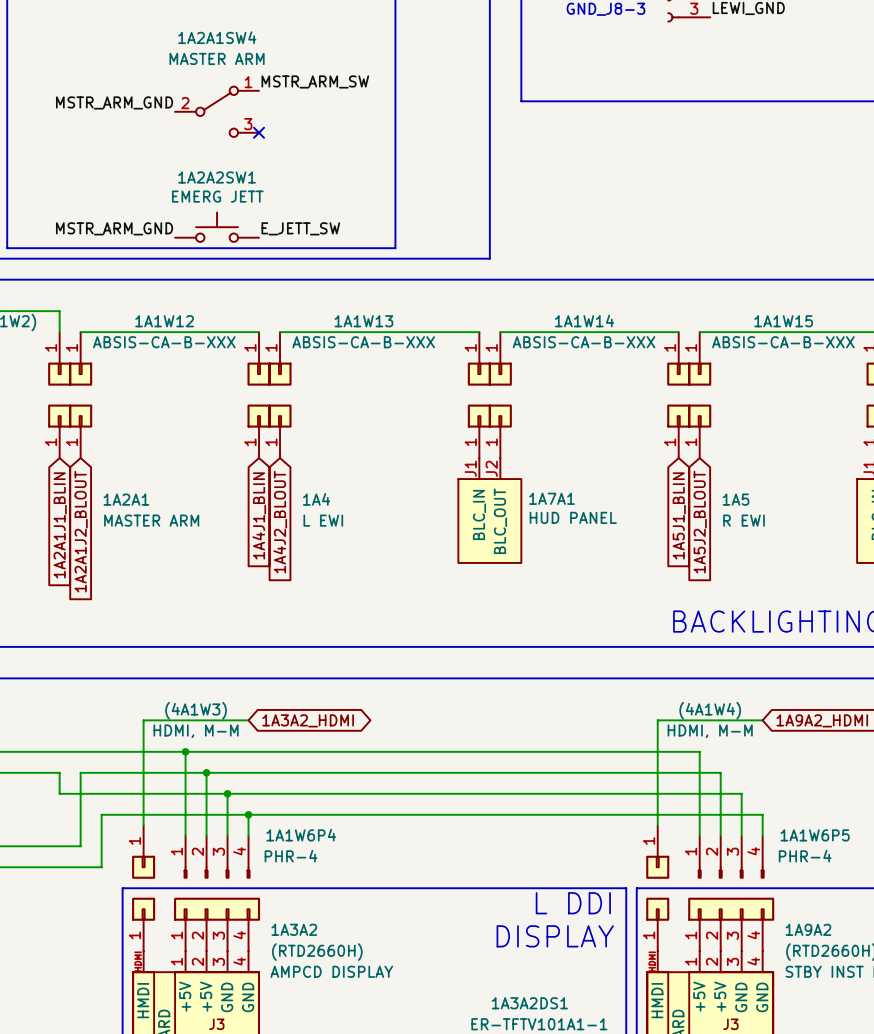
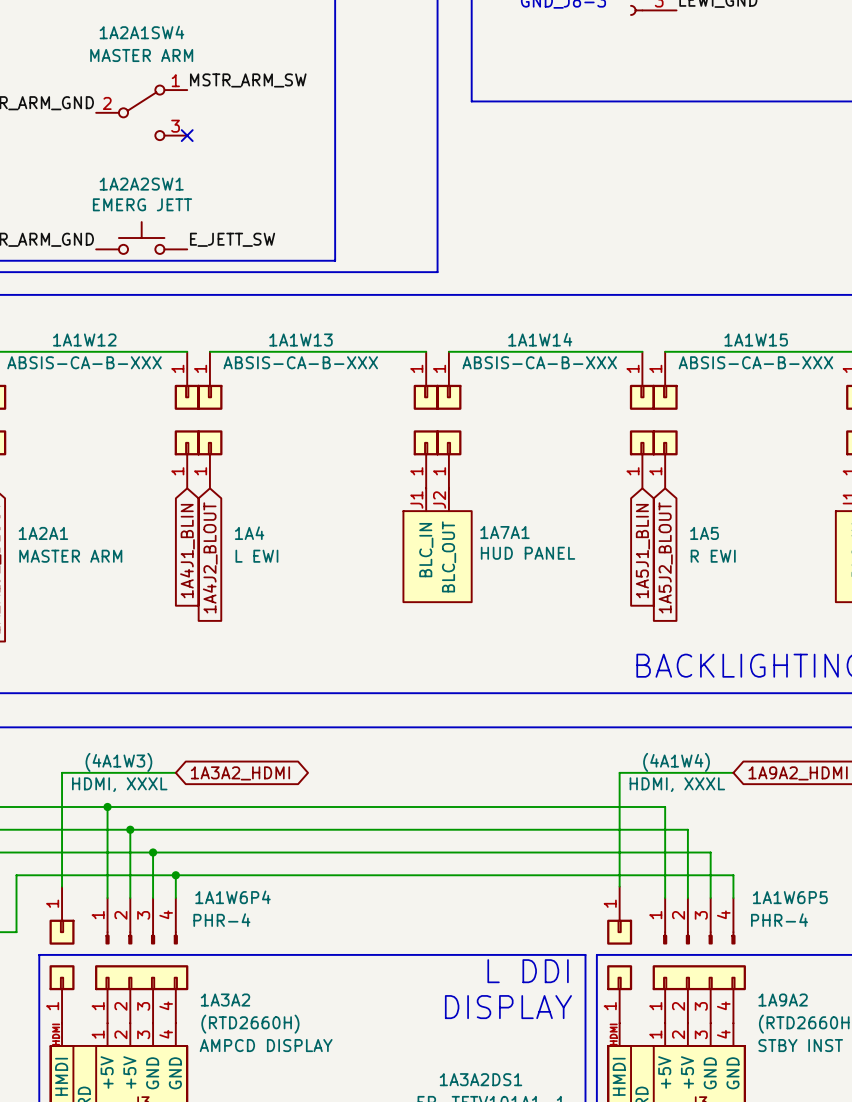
(4A1W3) value: HDMI, M-M (196, 731) -> HDMI, XXXL (119, 784)
(4A1W4) value: HDMI, M-M (710, 731) -> HDMI, XXXL (677, 784)

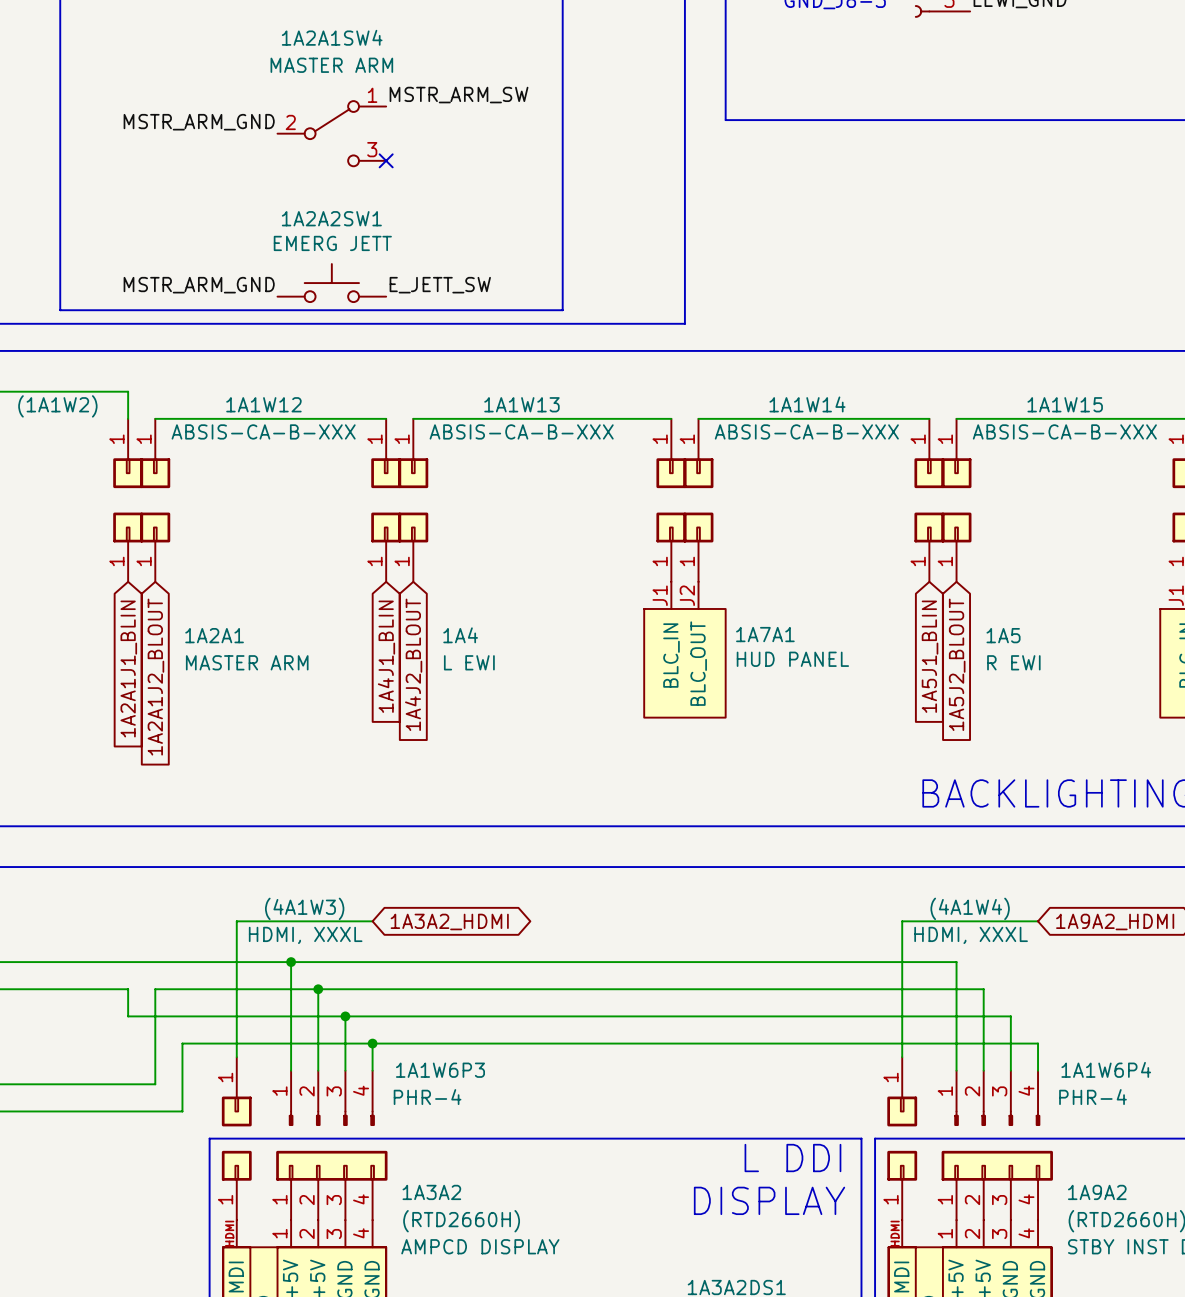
1A1W6P4 name: 1A1W6P4 (232, 897) -> 1A1W6P3 (440, 1070)
1A1W6P5 name: 1A1W6P5 (790, 897) -> 1A1W6P4 (1106, 1069)

